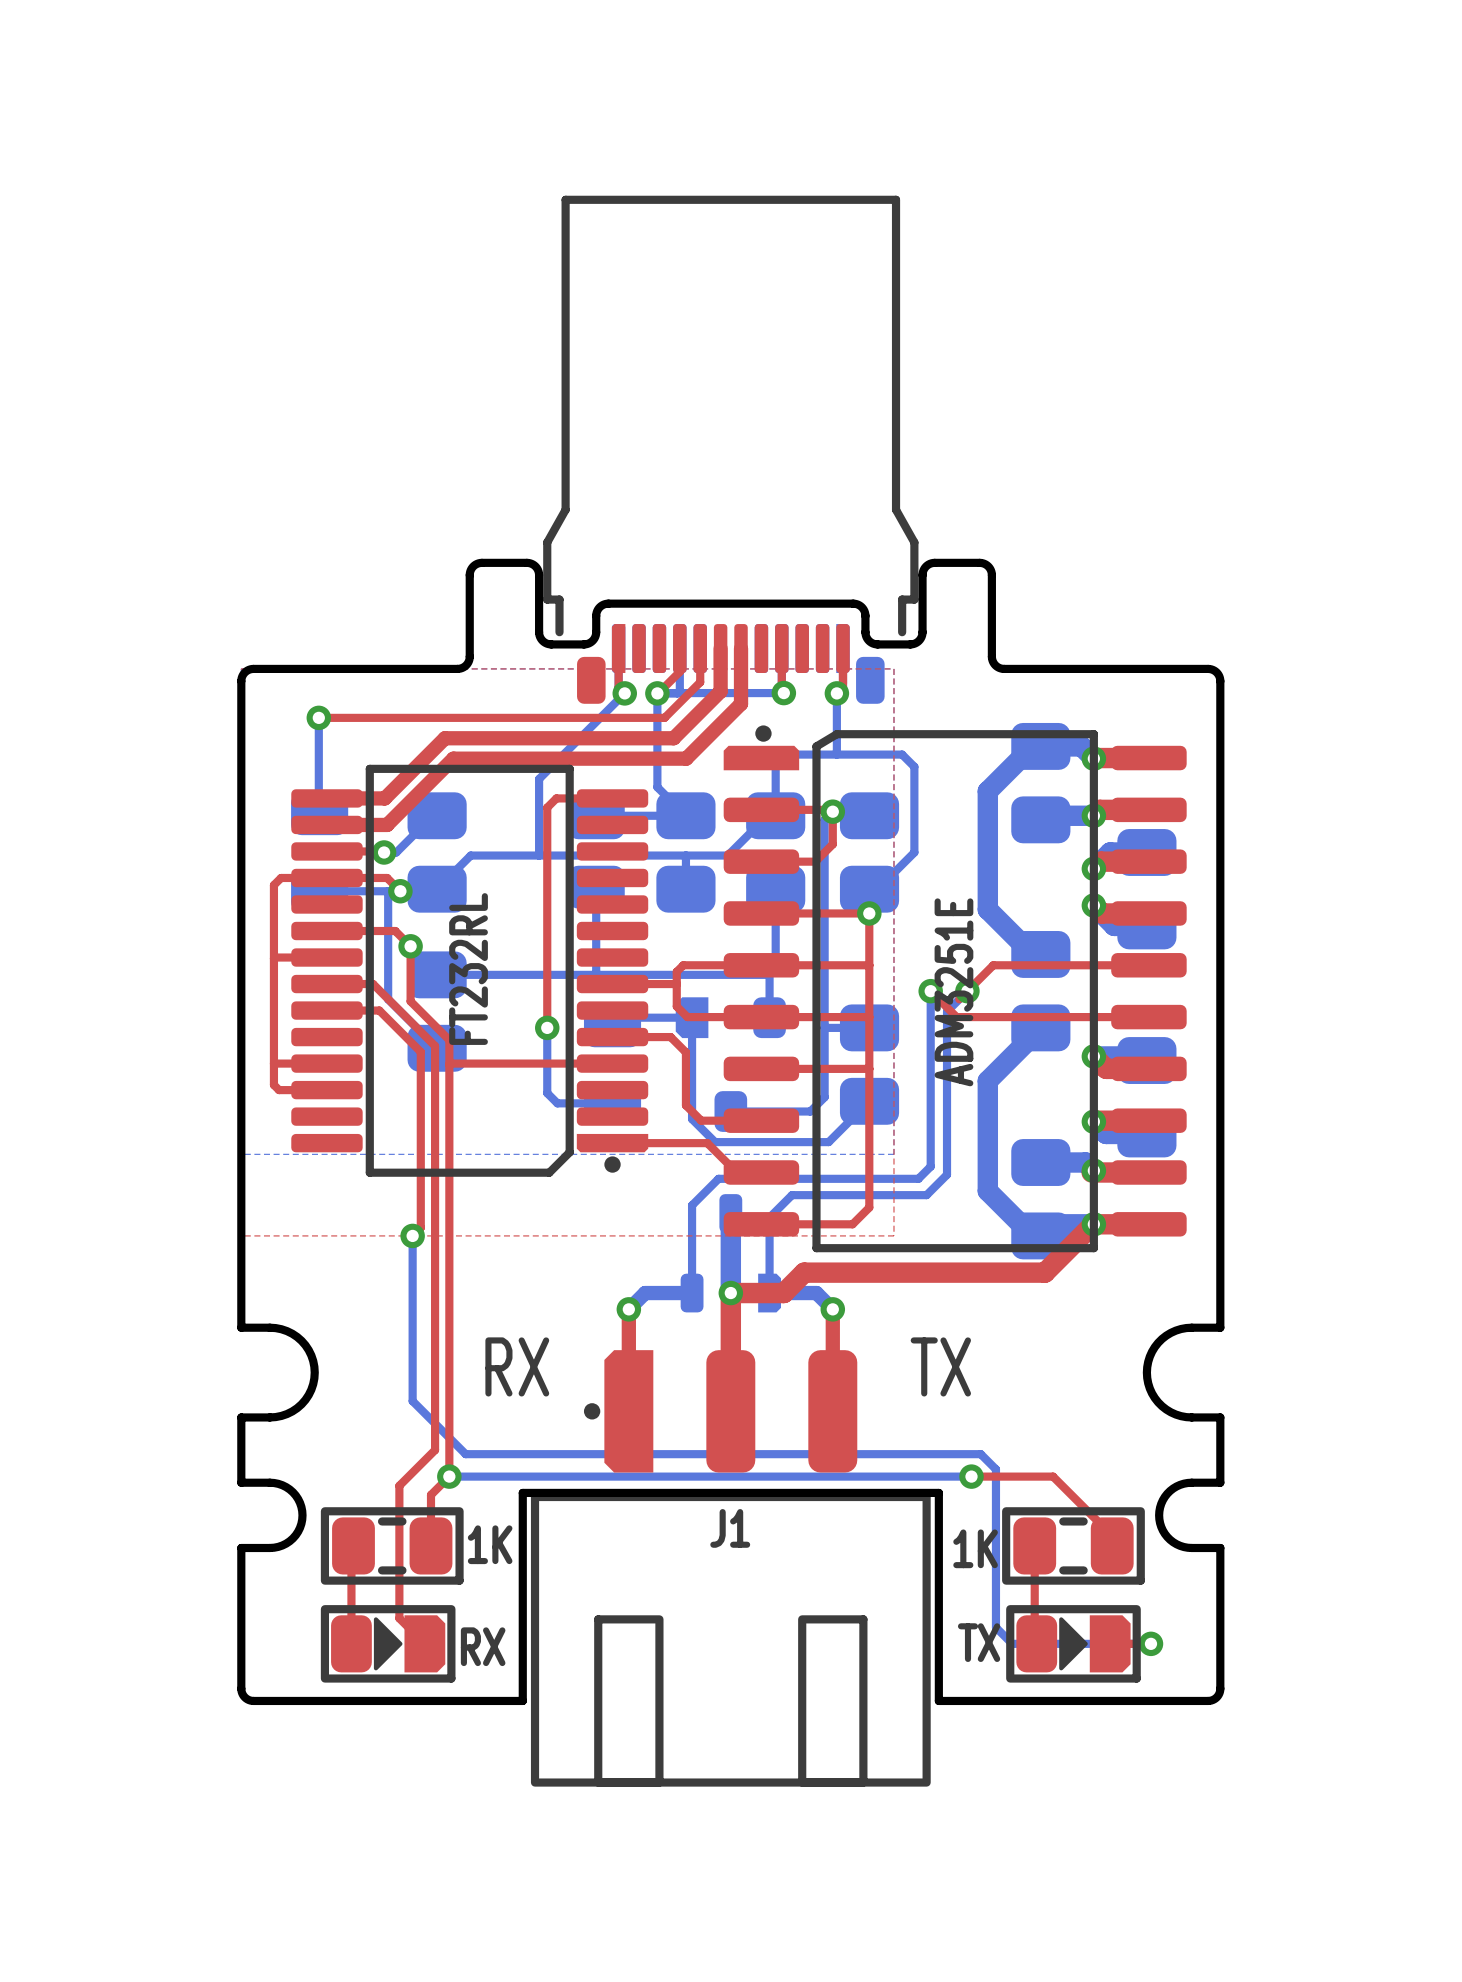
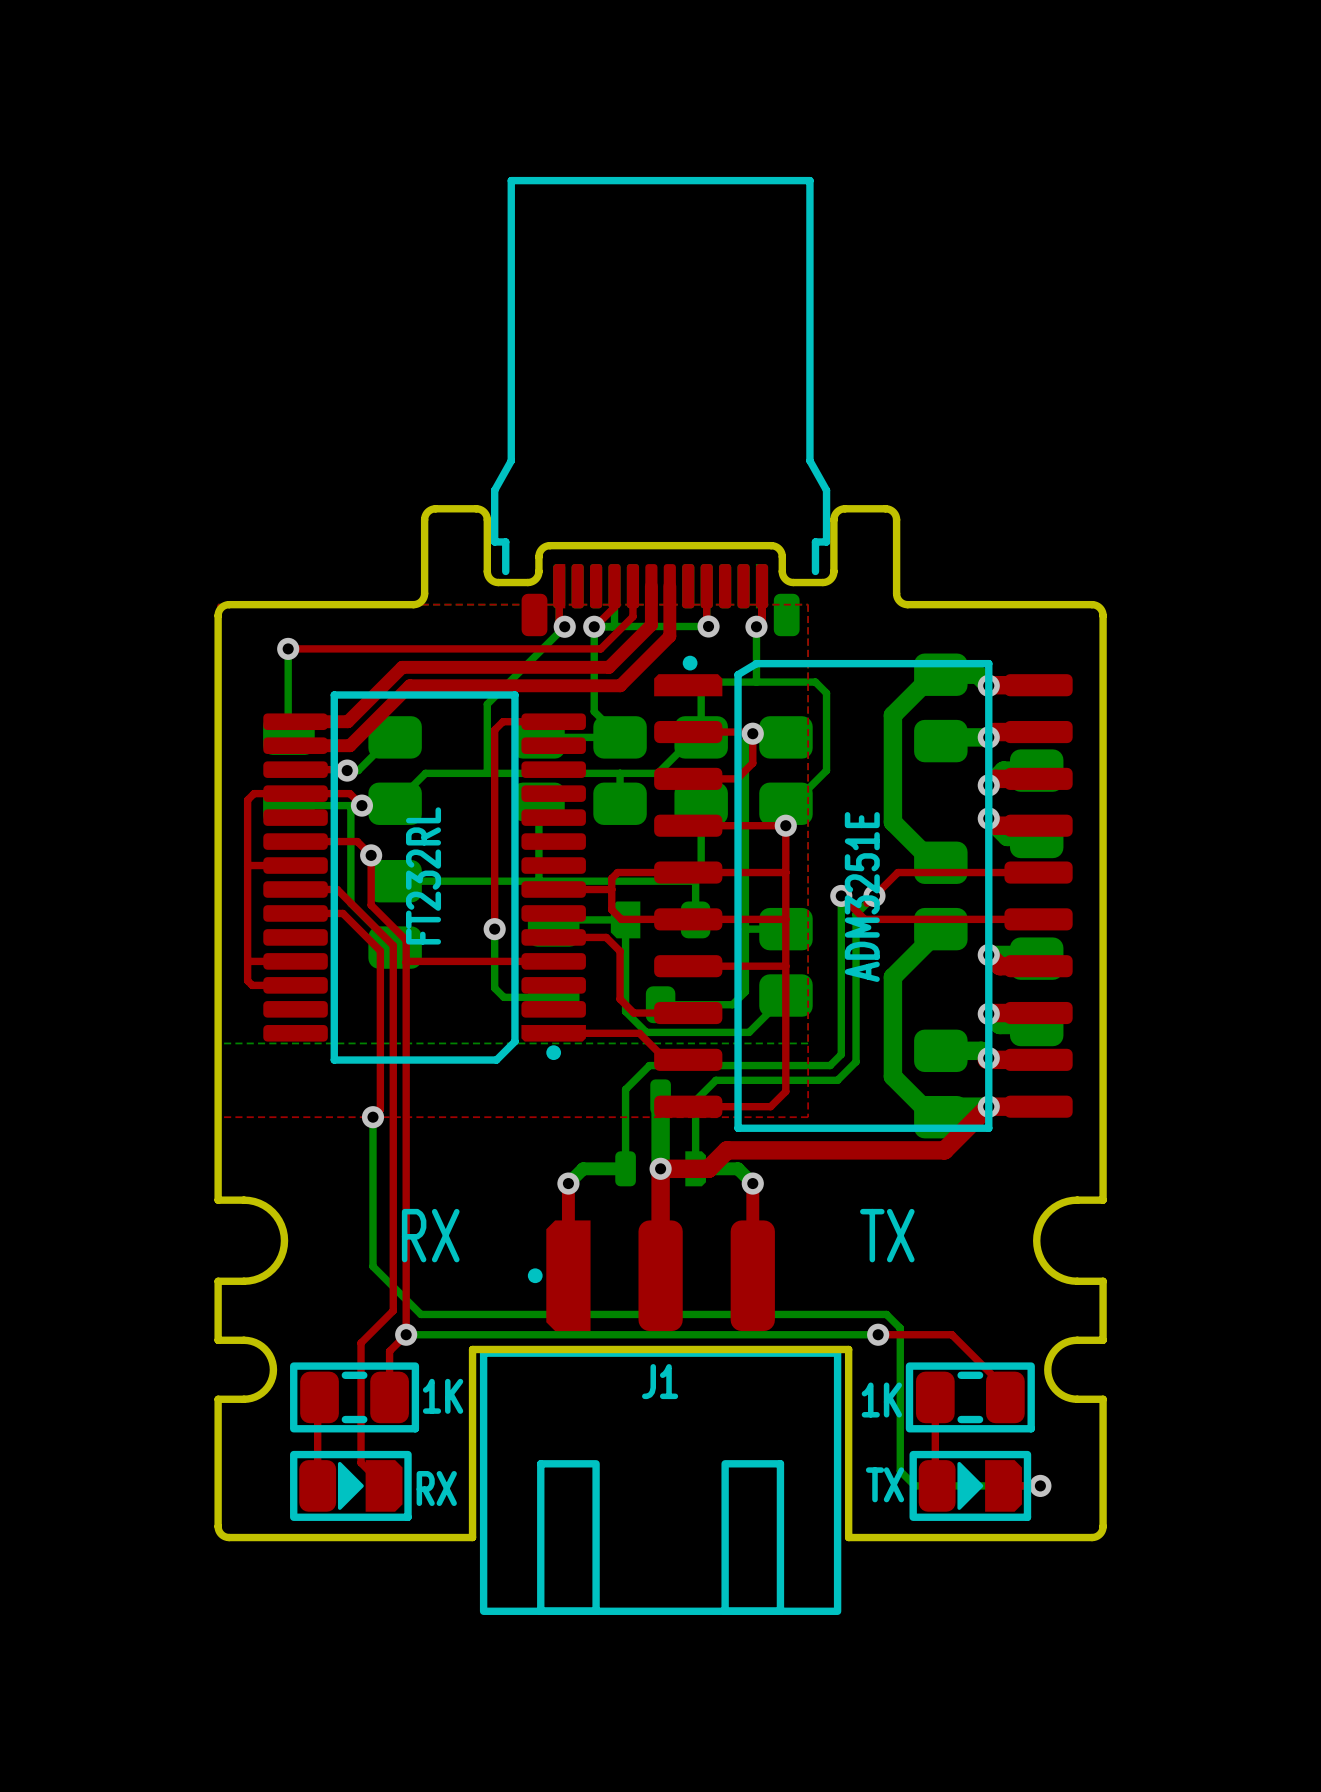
text position: RX (517, 1366) -> RX (430, 1235)
text position: TX (940, 1366) -> TX (887, 1235)

